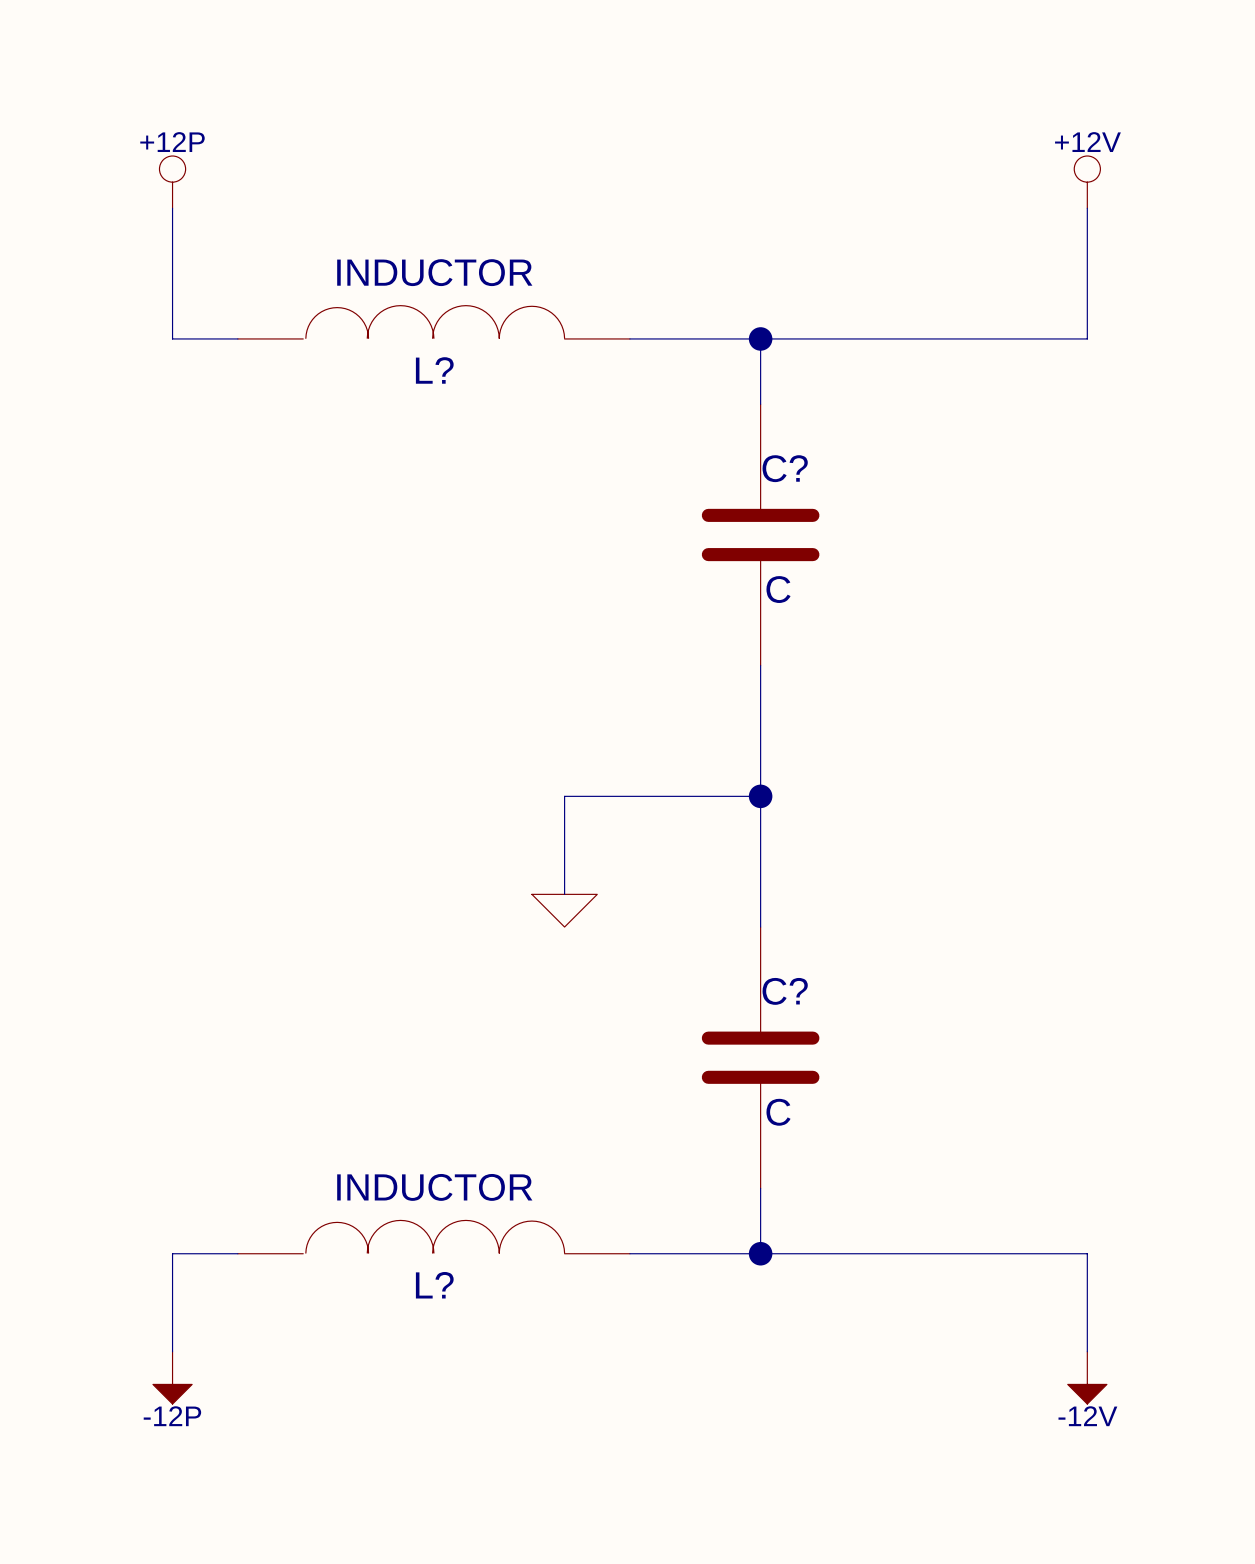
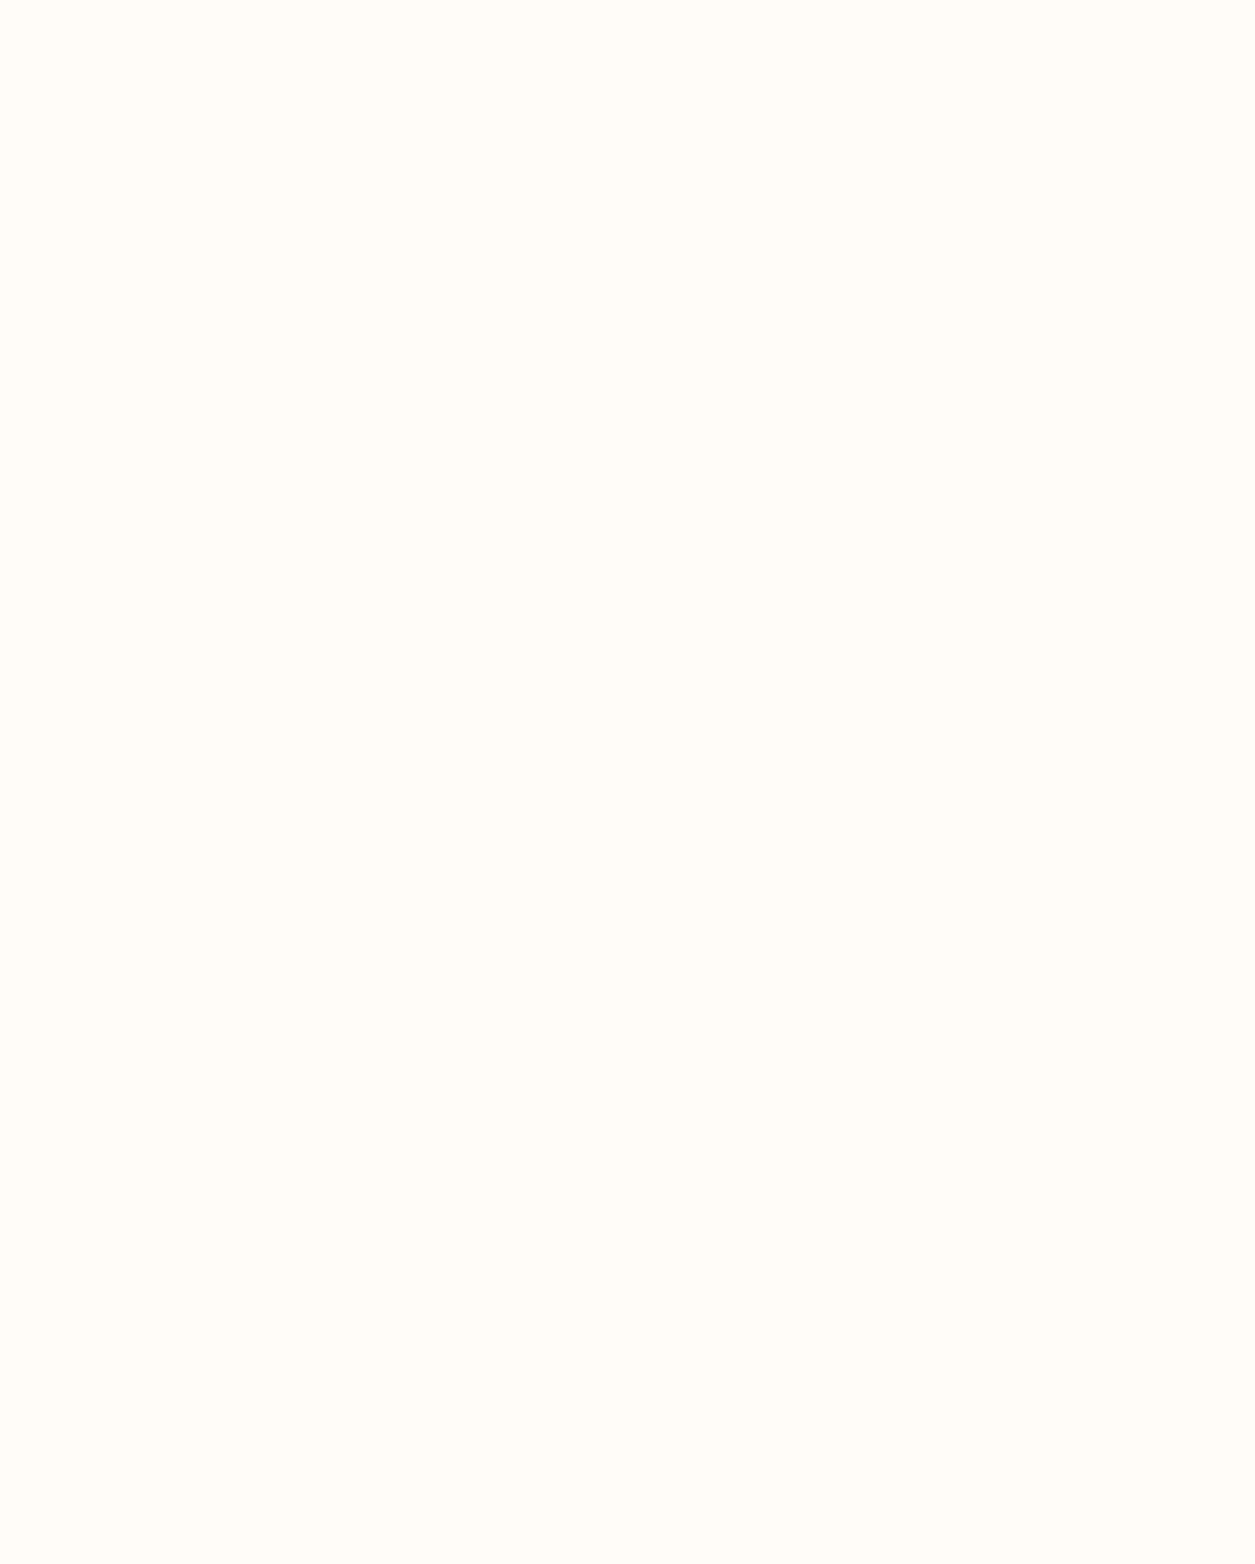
power symbol: +12P (172, 182) -> none
power symbol: +12V (1087, 182) -> none
wire: (172, 208) (172, 338) (237, 338) -> none
wire: (1087, 208) (1087, 338) (629, 338) -> none
L?: INDUCTOR (433, 322) -> none
wire: (760, 338) (760, 404) -> none
junction: (760, 338) -> none
C?: C (760, 534) -> none
wire: (760, 665) (760, 927) -> none
wire: (760, 796) (564, 796) (564, 894) -> none
junction: (760, 796) -> none
power symbol: (564, 910) -> none
C?: C (760, 1057) -> none
wire: (760, 1188) (760, 1253) -> none
L?: INDUCTOR (433, 1237) -> none
wire: (237, 1253) (172, 1253) (172, 1351) -> none
wire: (629, 1253) (1087, 1253) (1087, 1351) -> none
junction: (760, 1253) -> none
power symbol: -12P (172, 1377) -> none
power symbol: -12V (1087, 1377) -> none

